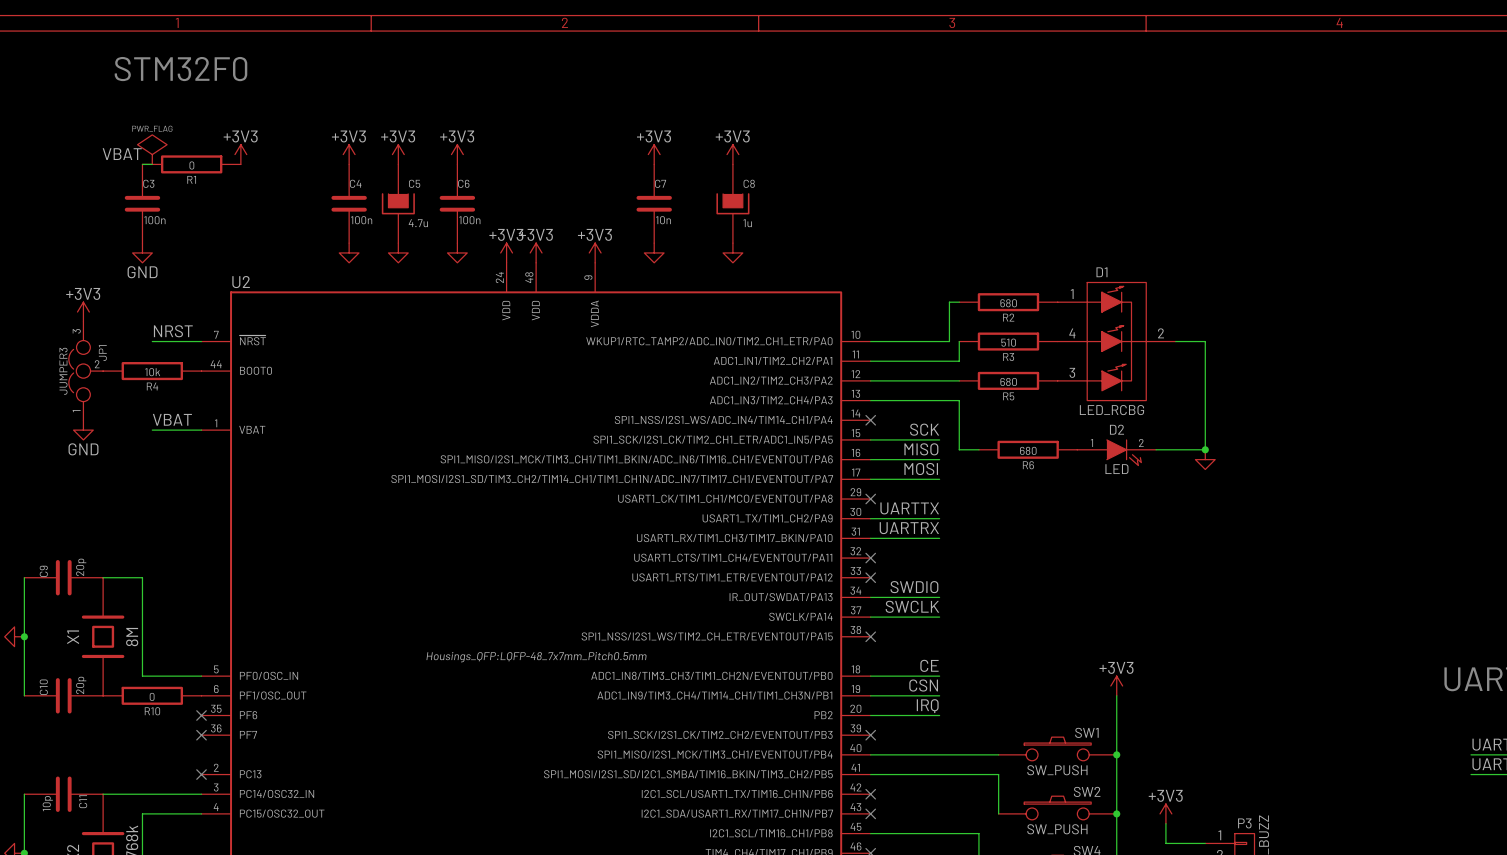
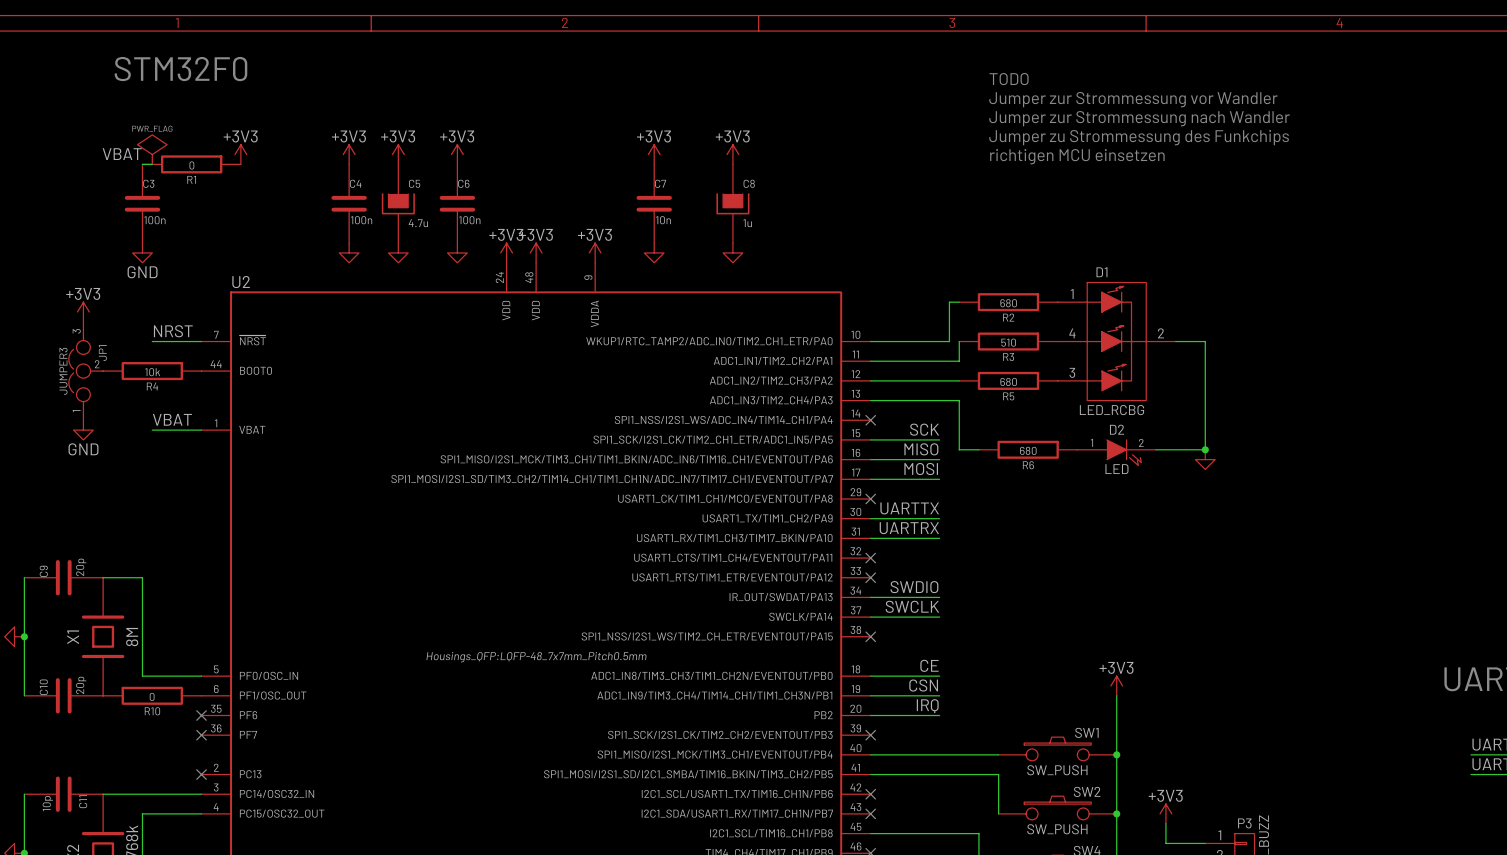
text: none -> TODO (1009, 79)
text: none -> Jumper zur Strommessung vor Wandler (1133, 99)
text: none -> Jumper zur Strommessung nach Wandler (1139, 118)
text: none -> Jumper zu Strommessung des Funkchips (1139, 137)
text: none -> richtigen MCU einsetzen (1077, 156)

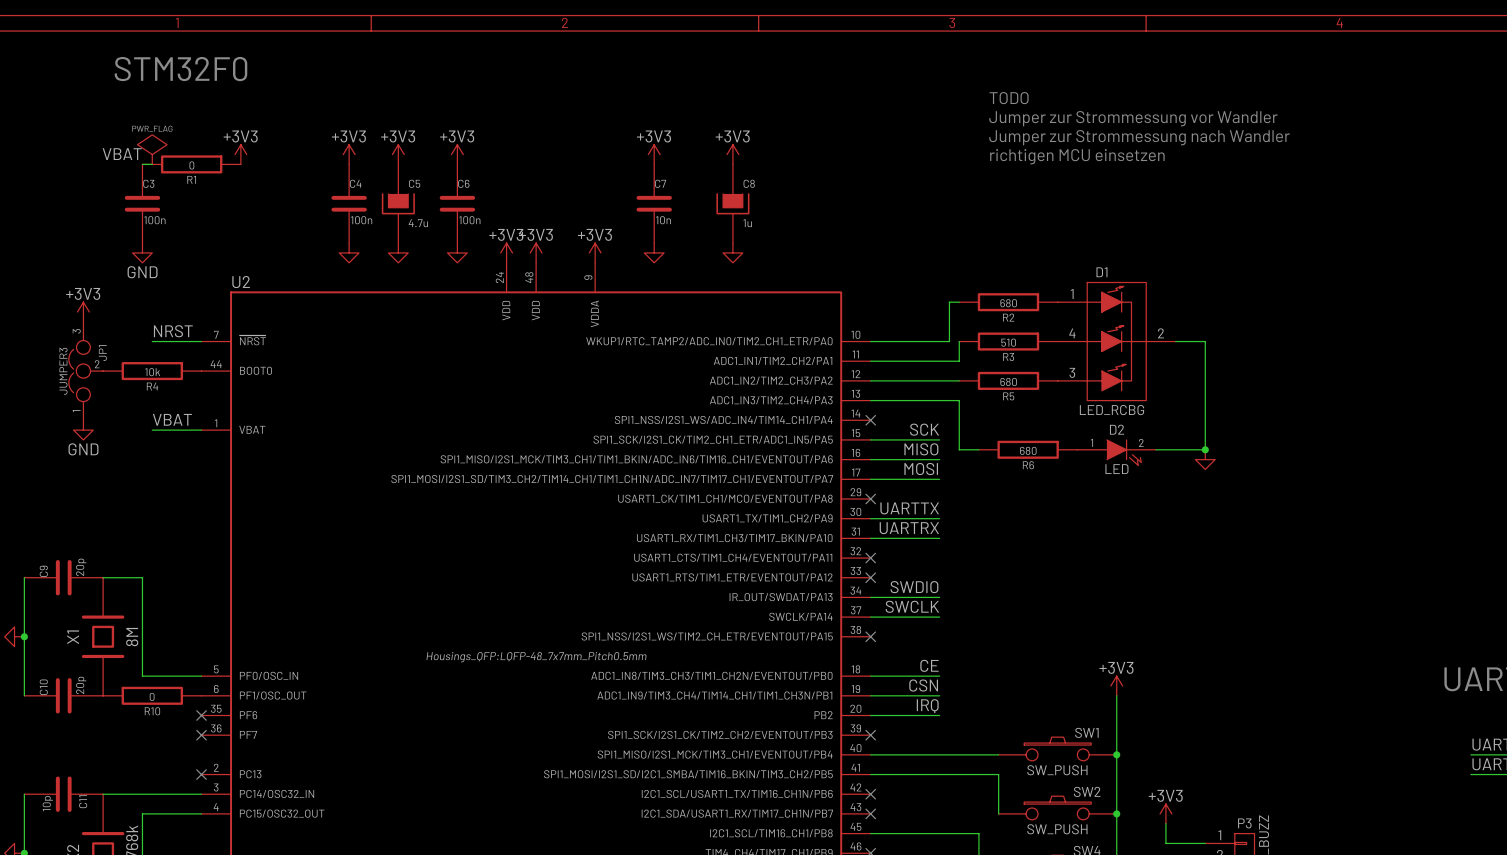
text: TODO (1009, 79) -> none
text: Jumper zur Strommessung vor Wandler (1133, 99) -> TODO (1009, 98)
text: Jumper zur Strommessung nach Wandler (1139, 118) -> Jumper zur Strommessung vor Wandler (1133, 118)
text: Jumper zu Strommessung des Funkchips (1139, 137) -> Jumper zur Strommessung nach Wandler (1139, 137)

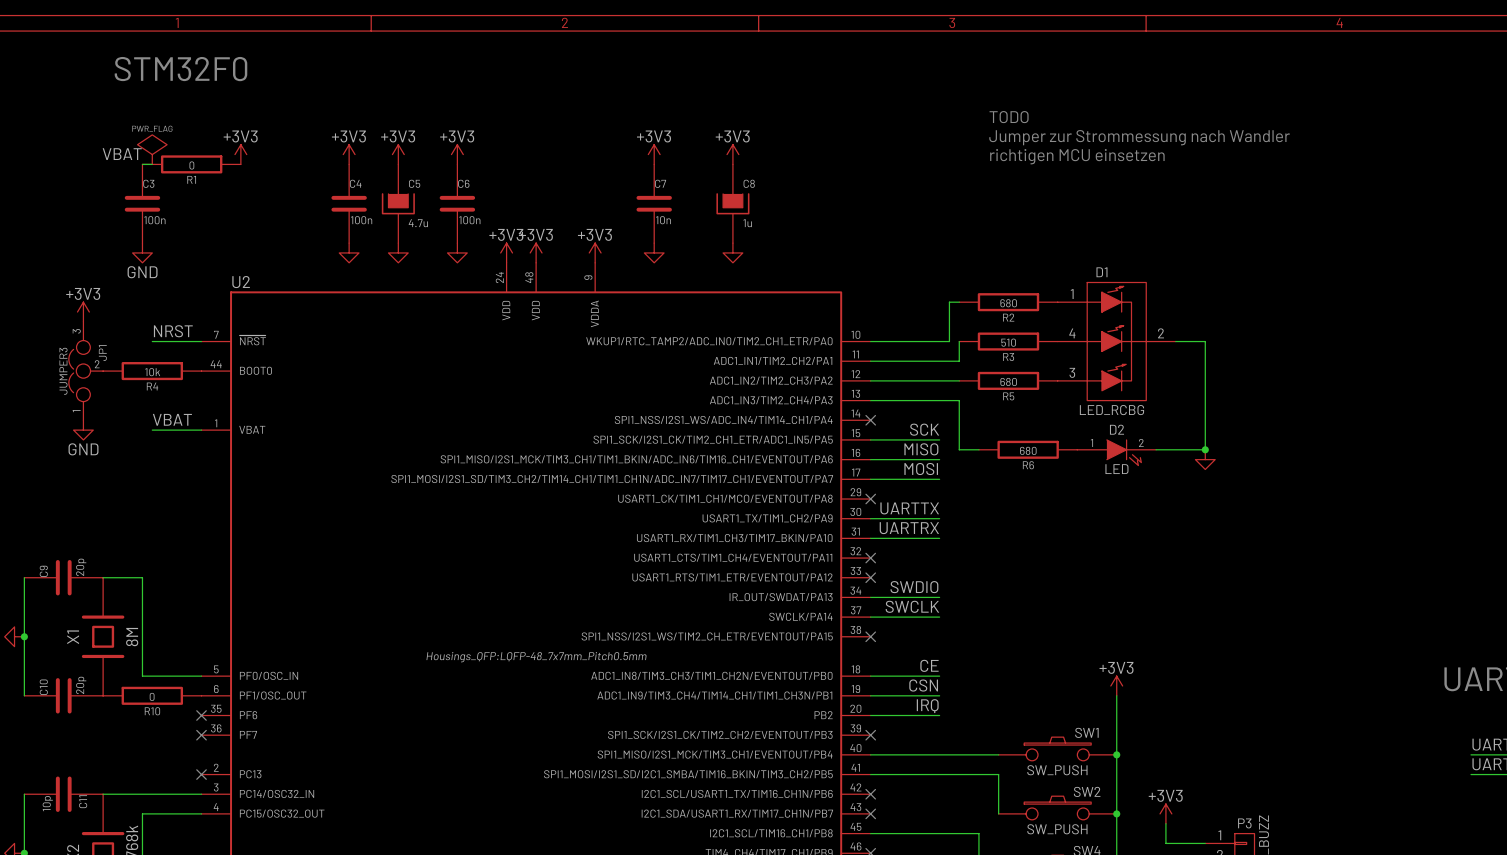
text: TODO (1009, 98) -> none
text: Jumper zur Strommessung vor Wandler (1133, 118) -> TODO (1009, 117)

